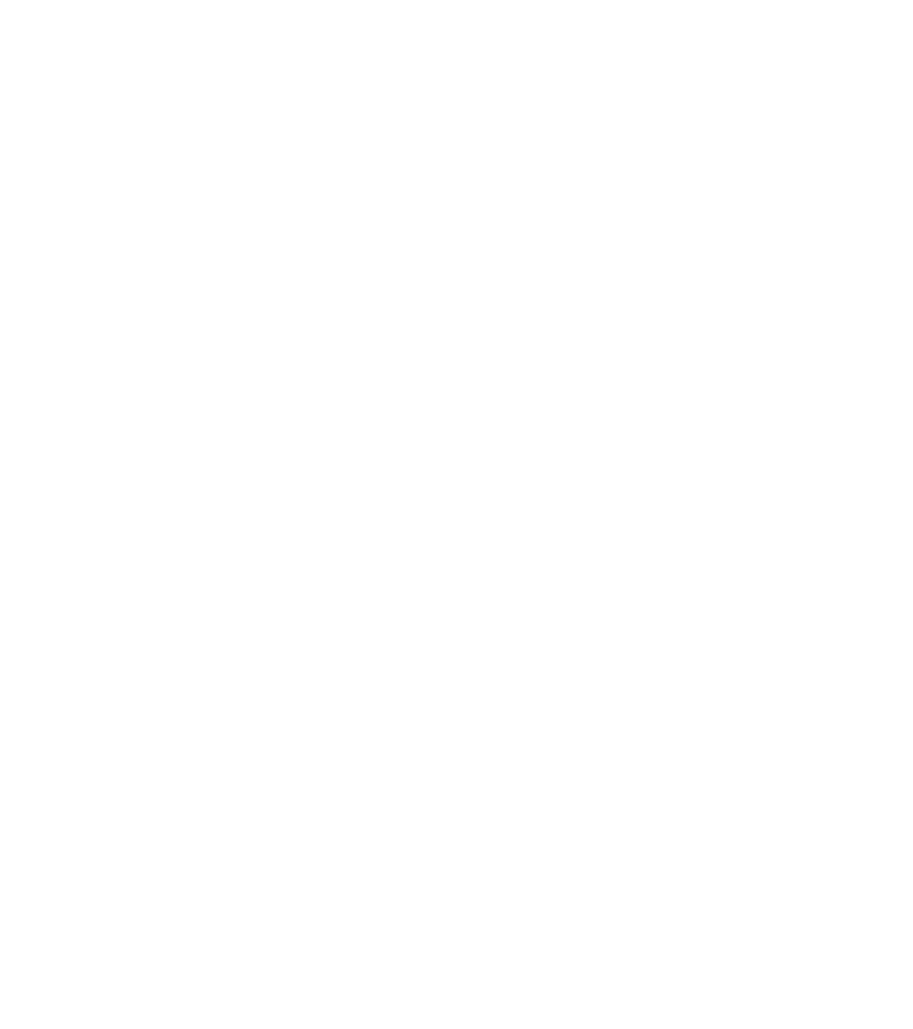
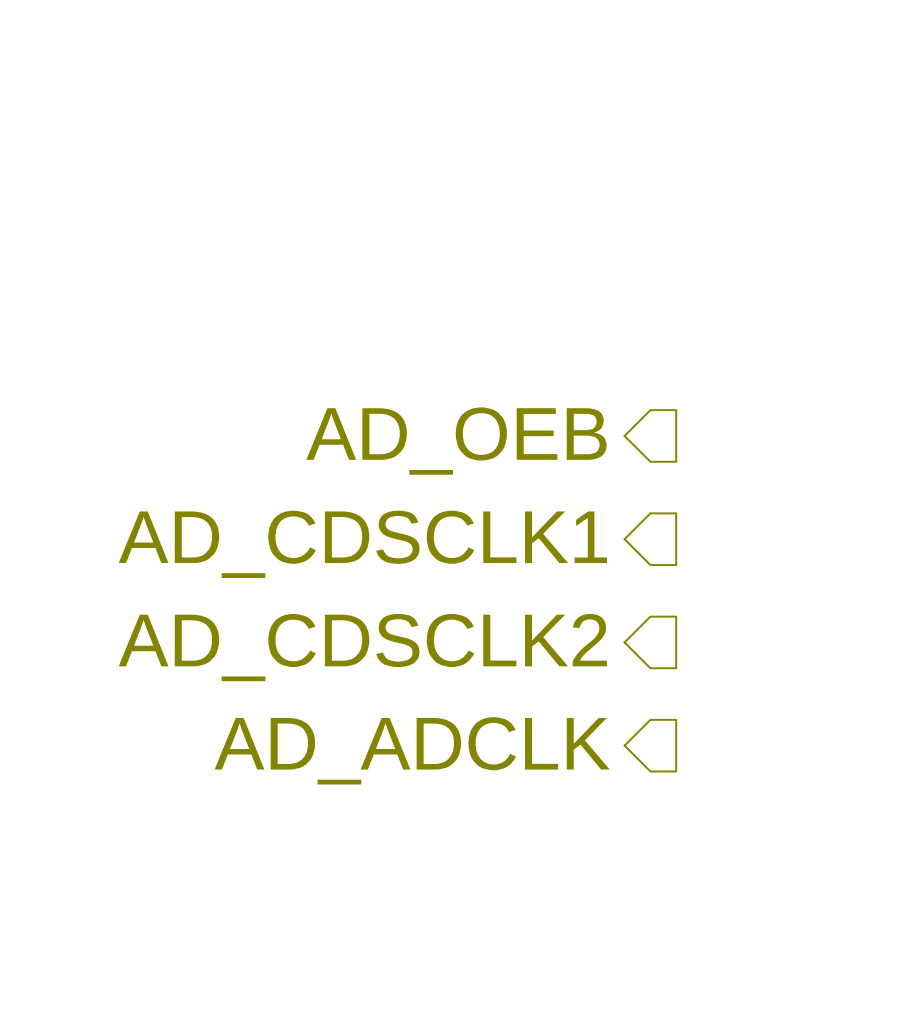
hierarchical label: none -> AD_OEB (456, 441)
hierarchical label: none -> AD_CDSCLK1 (362, 544)
hierarchical label: none -> AD_CDSCLK2 (362, 647)
hierarchical label: none -> AD_ADCLK (412, 750)

